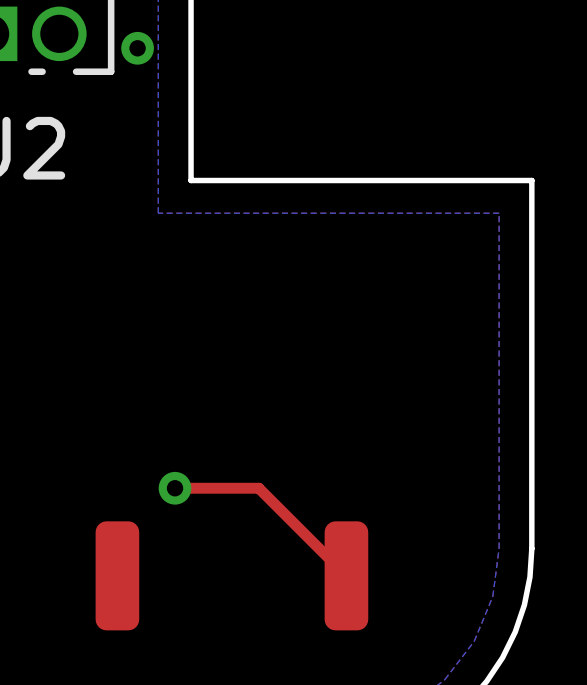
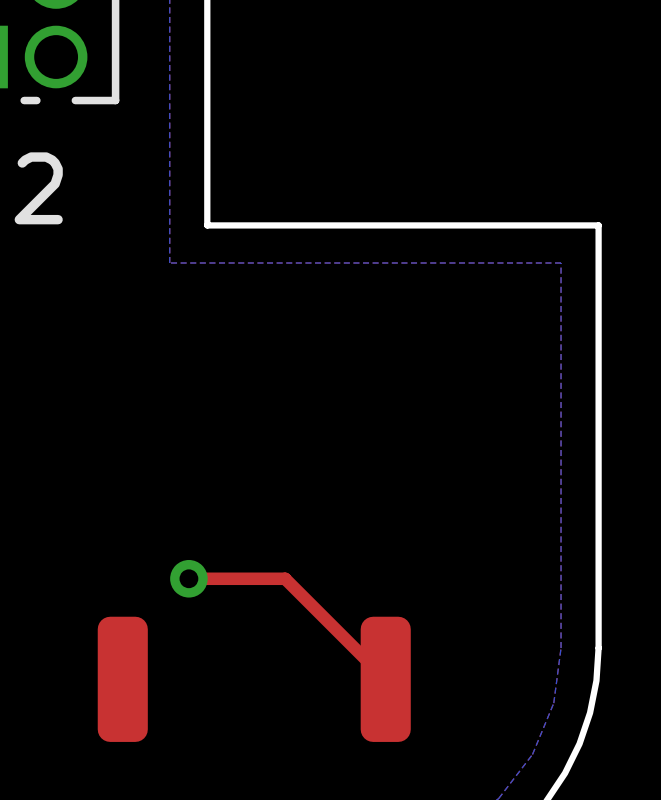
via: (137, 48) -> none

